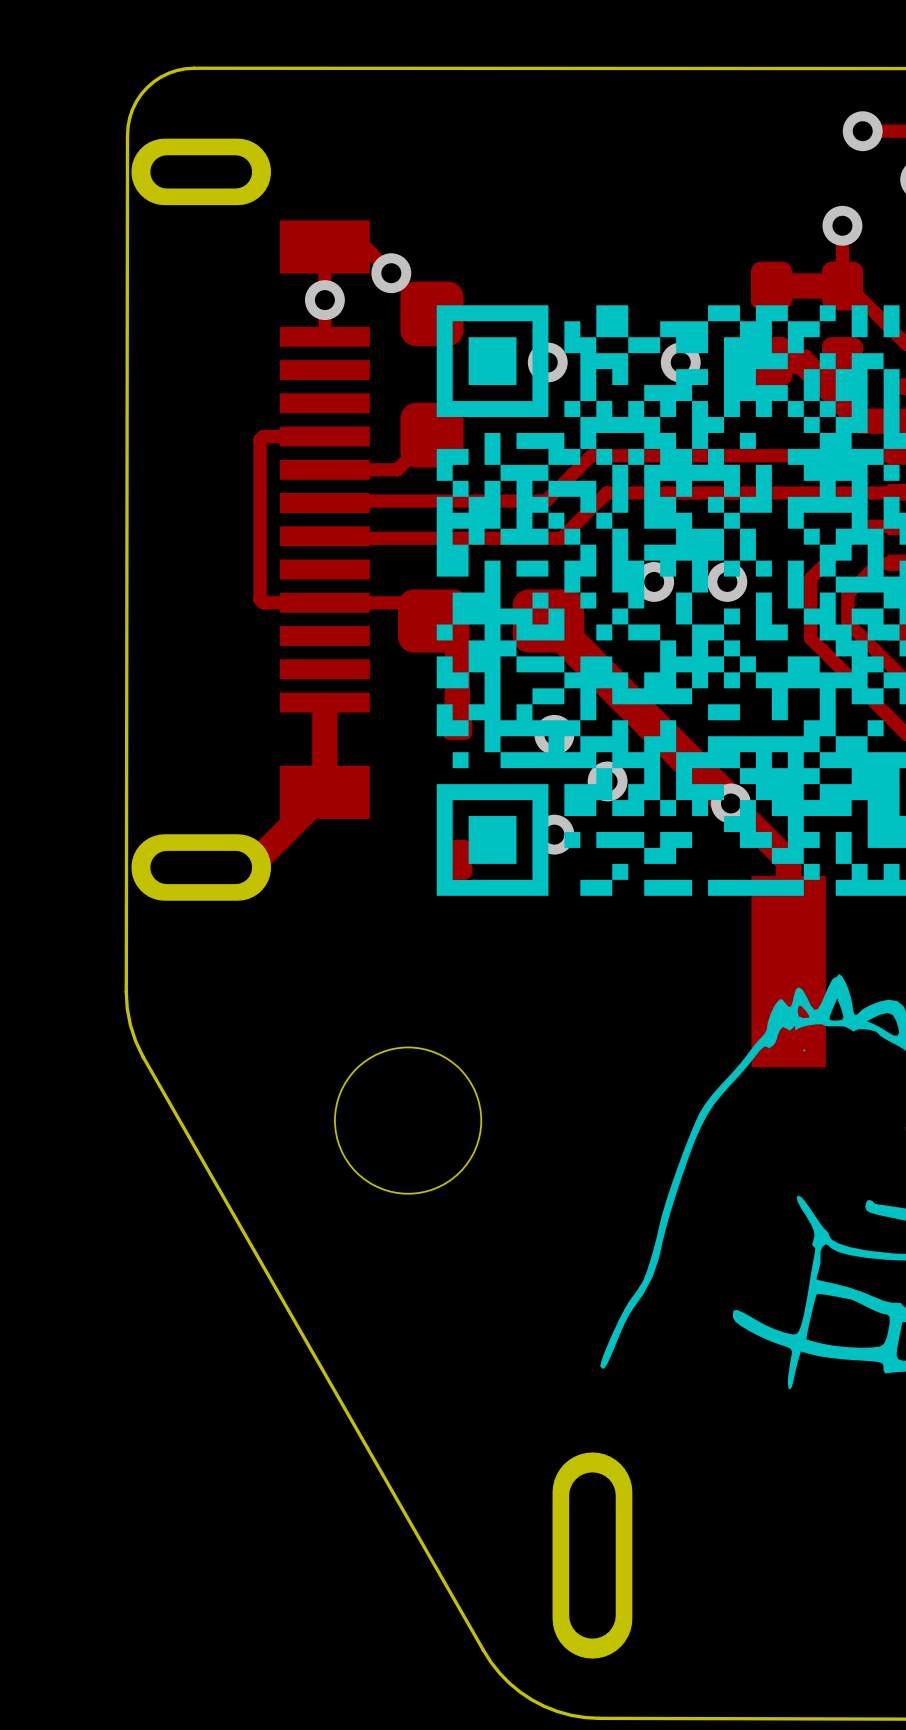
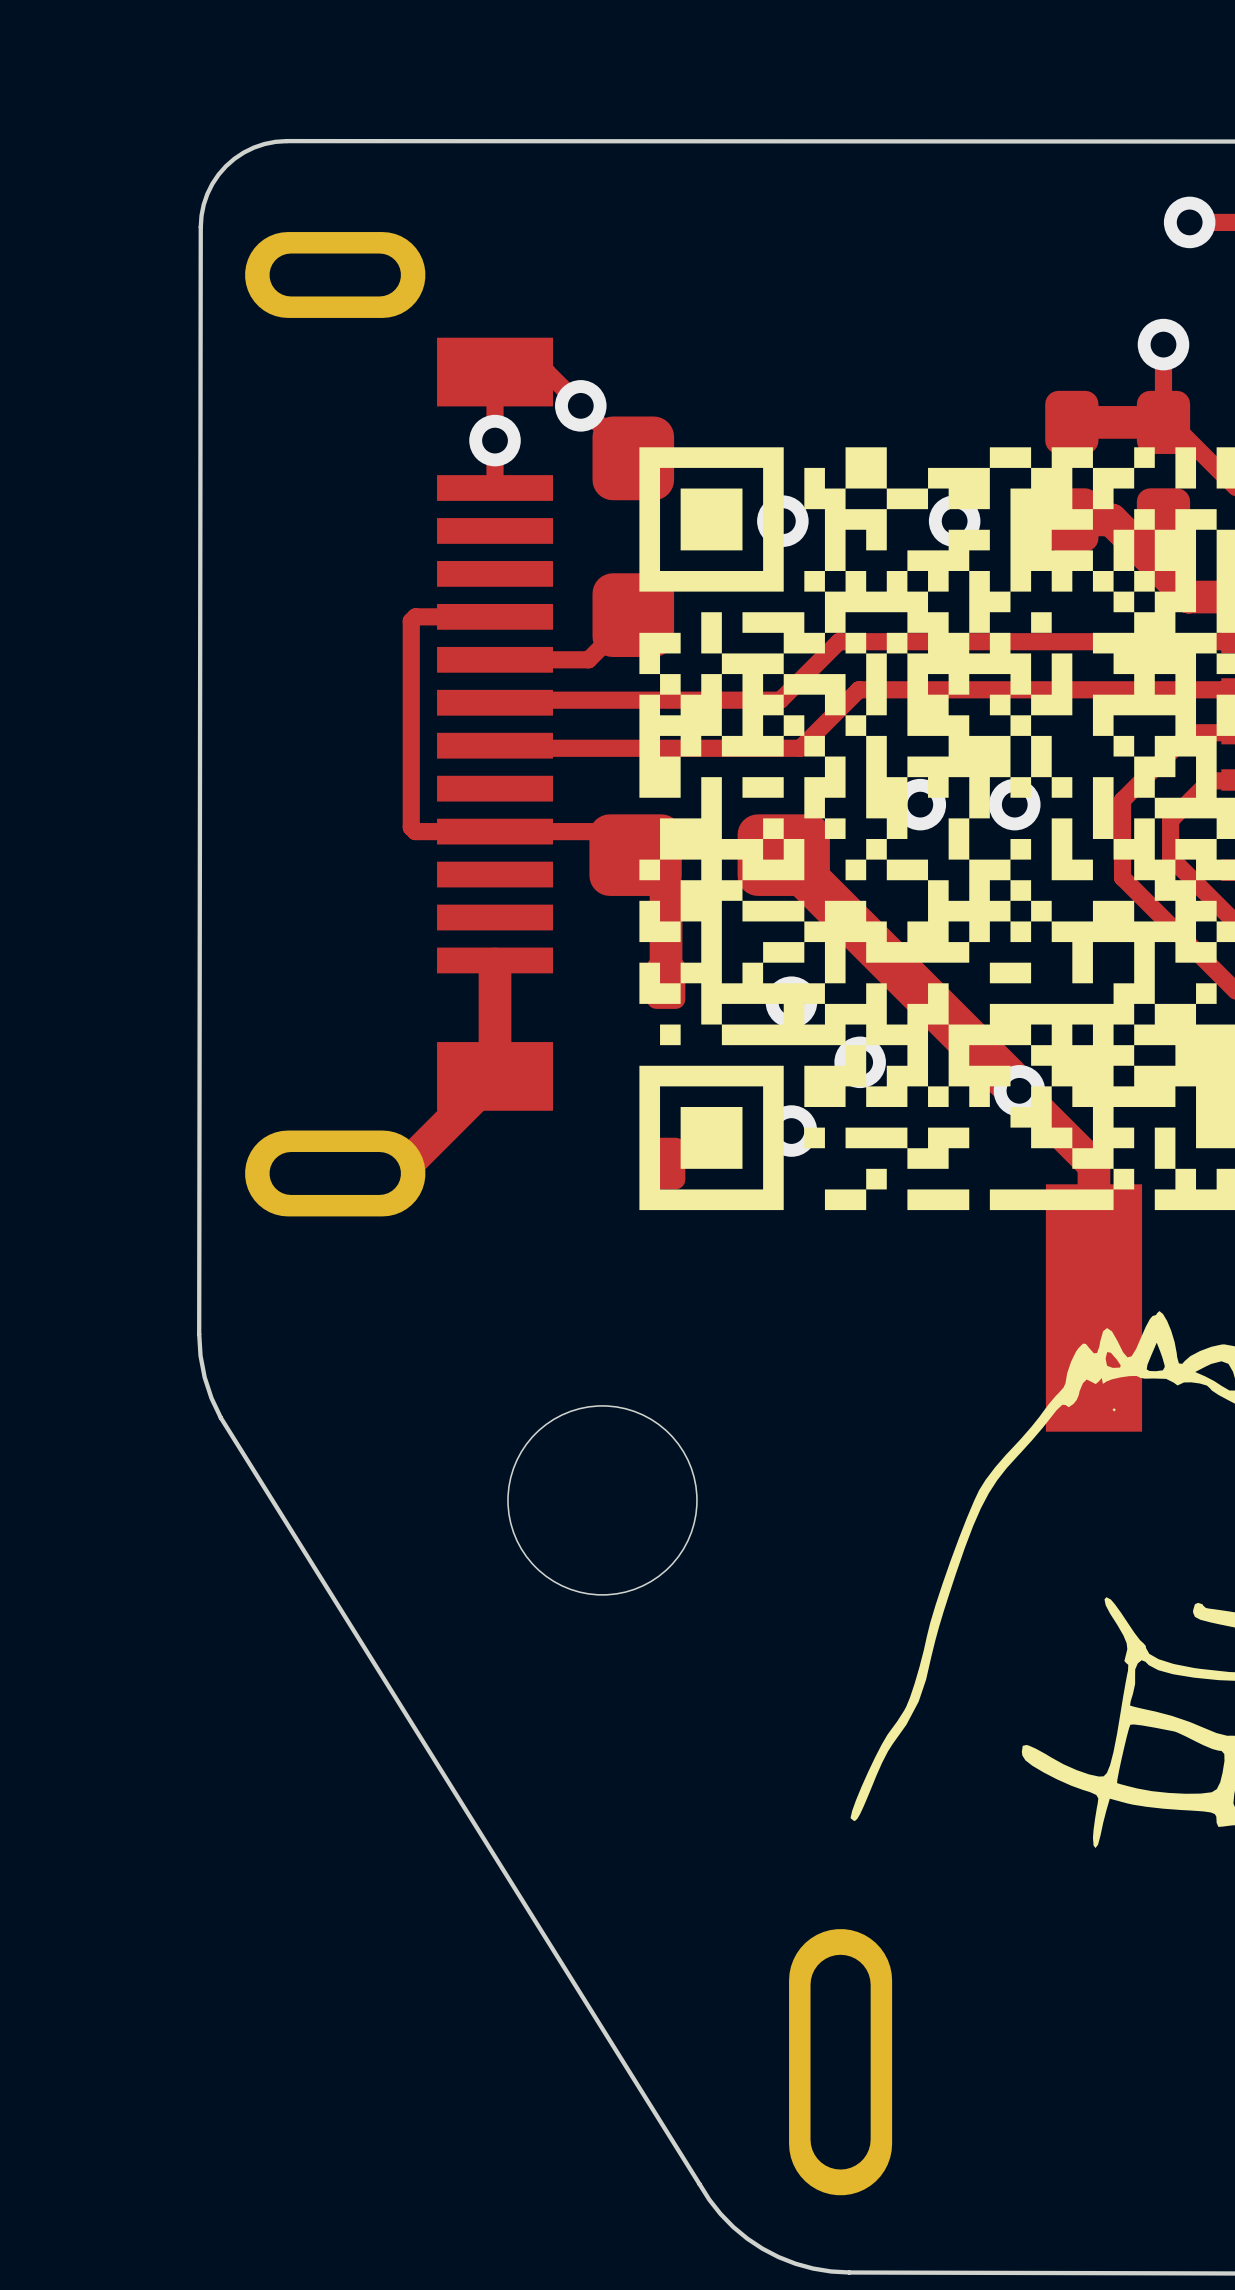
board edge: (194, 68) (168, 73) (147, 87) (132, 109) (128, 125) (127, 1008) (130, 1025) (143, 1056) (483, 1650) -> (326, 141) (275, 141) (243, 152) (225, 166) (212, 183) (201, 215) (200, 1355) (204, 1377) (220, 1417) (699, 2184)

